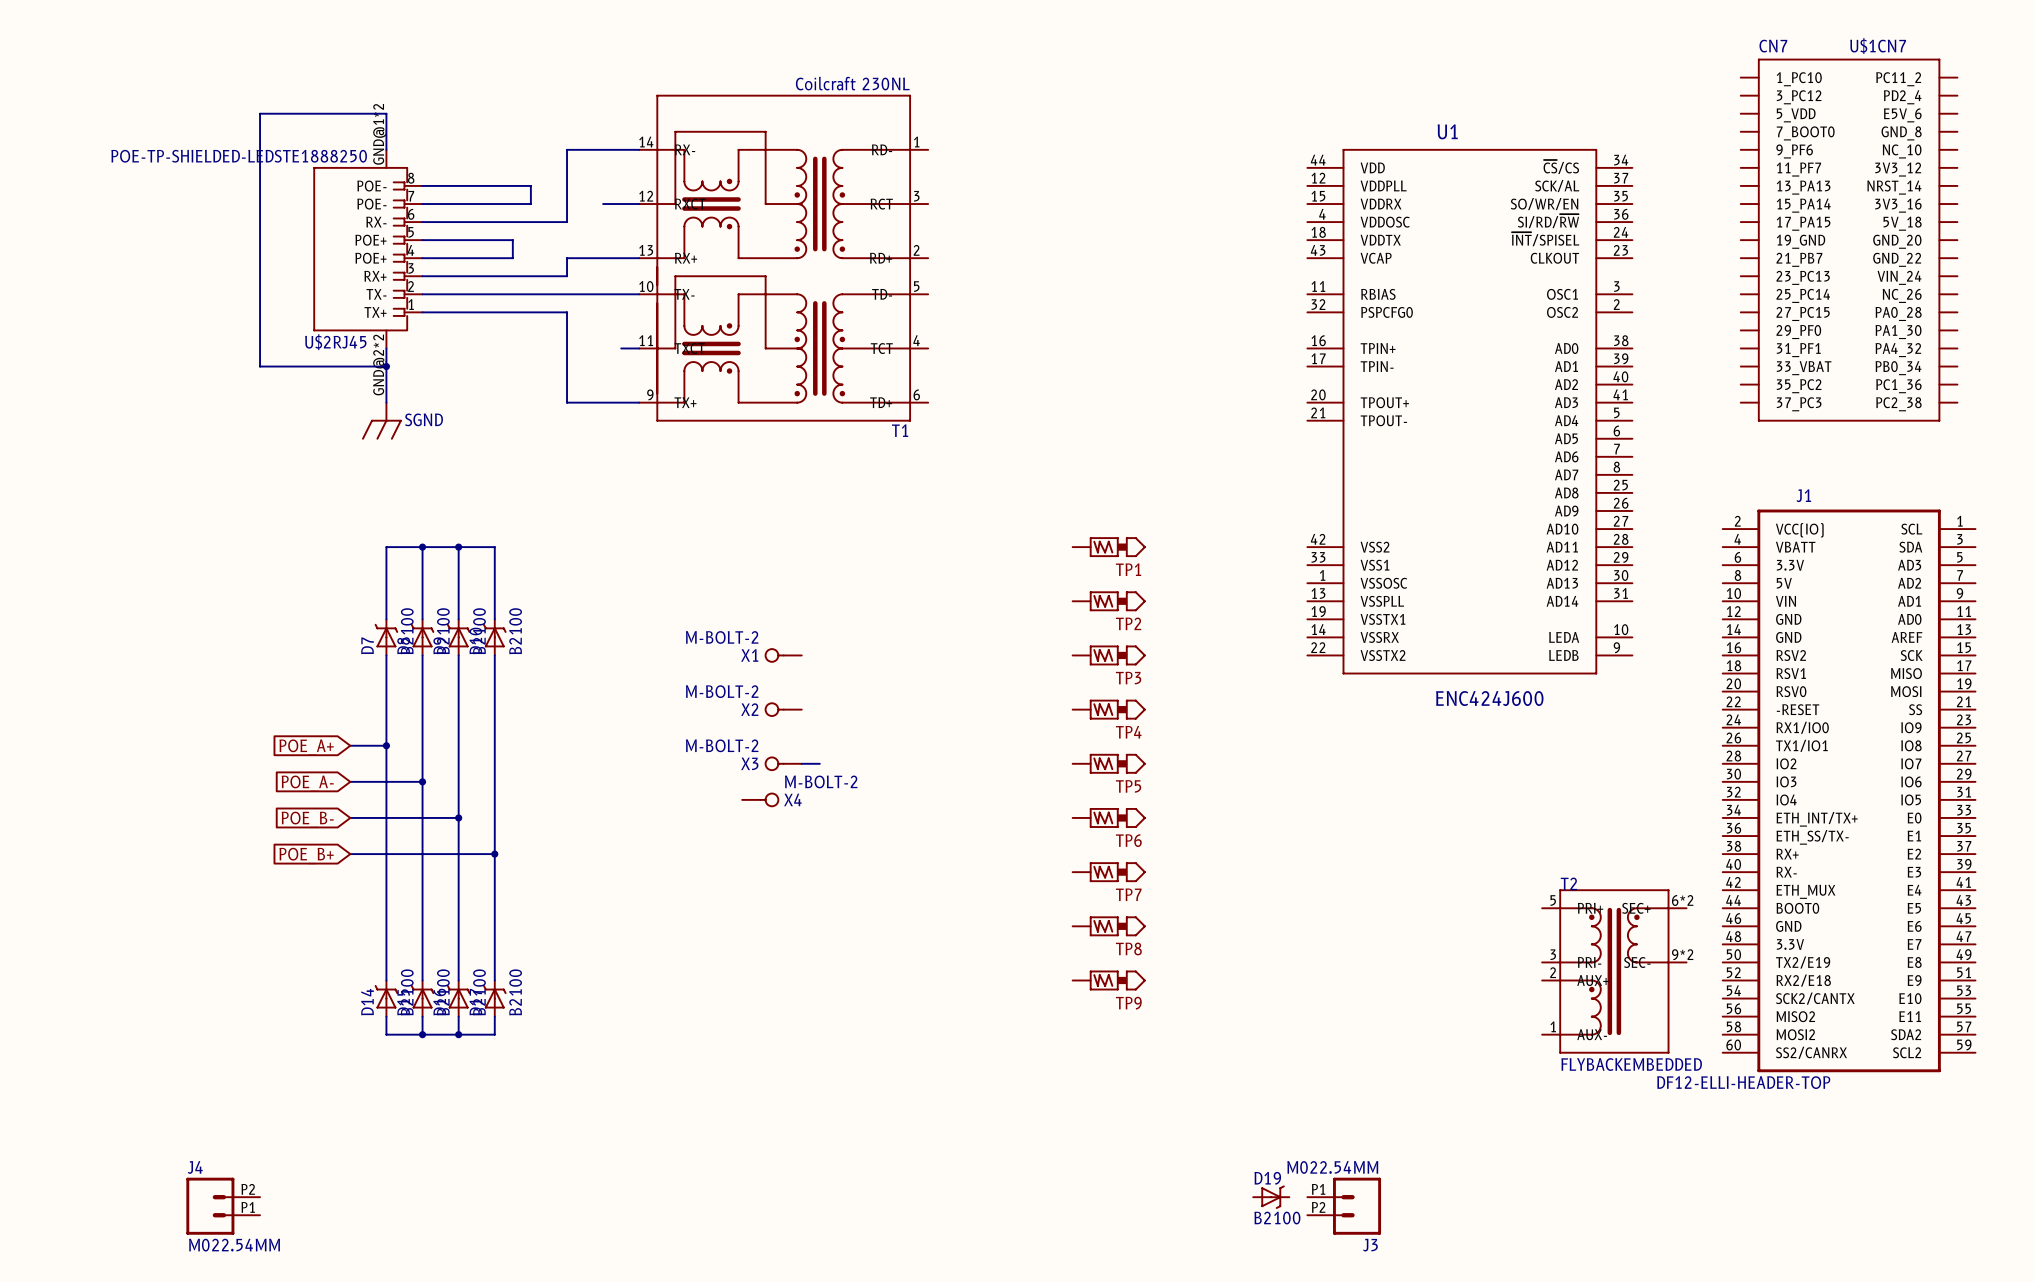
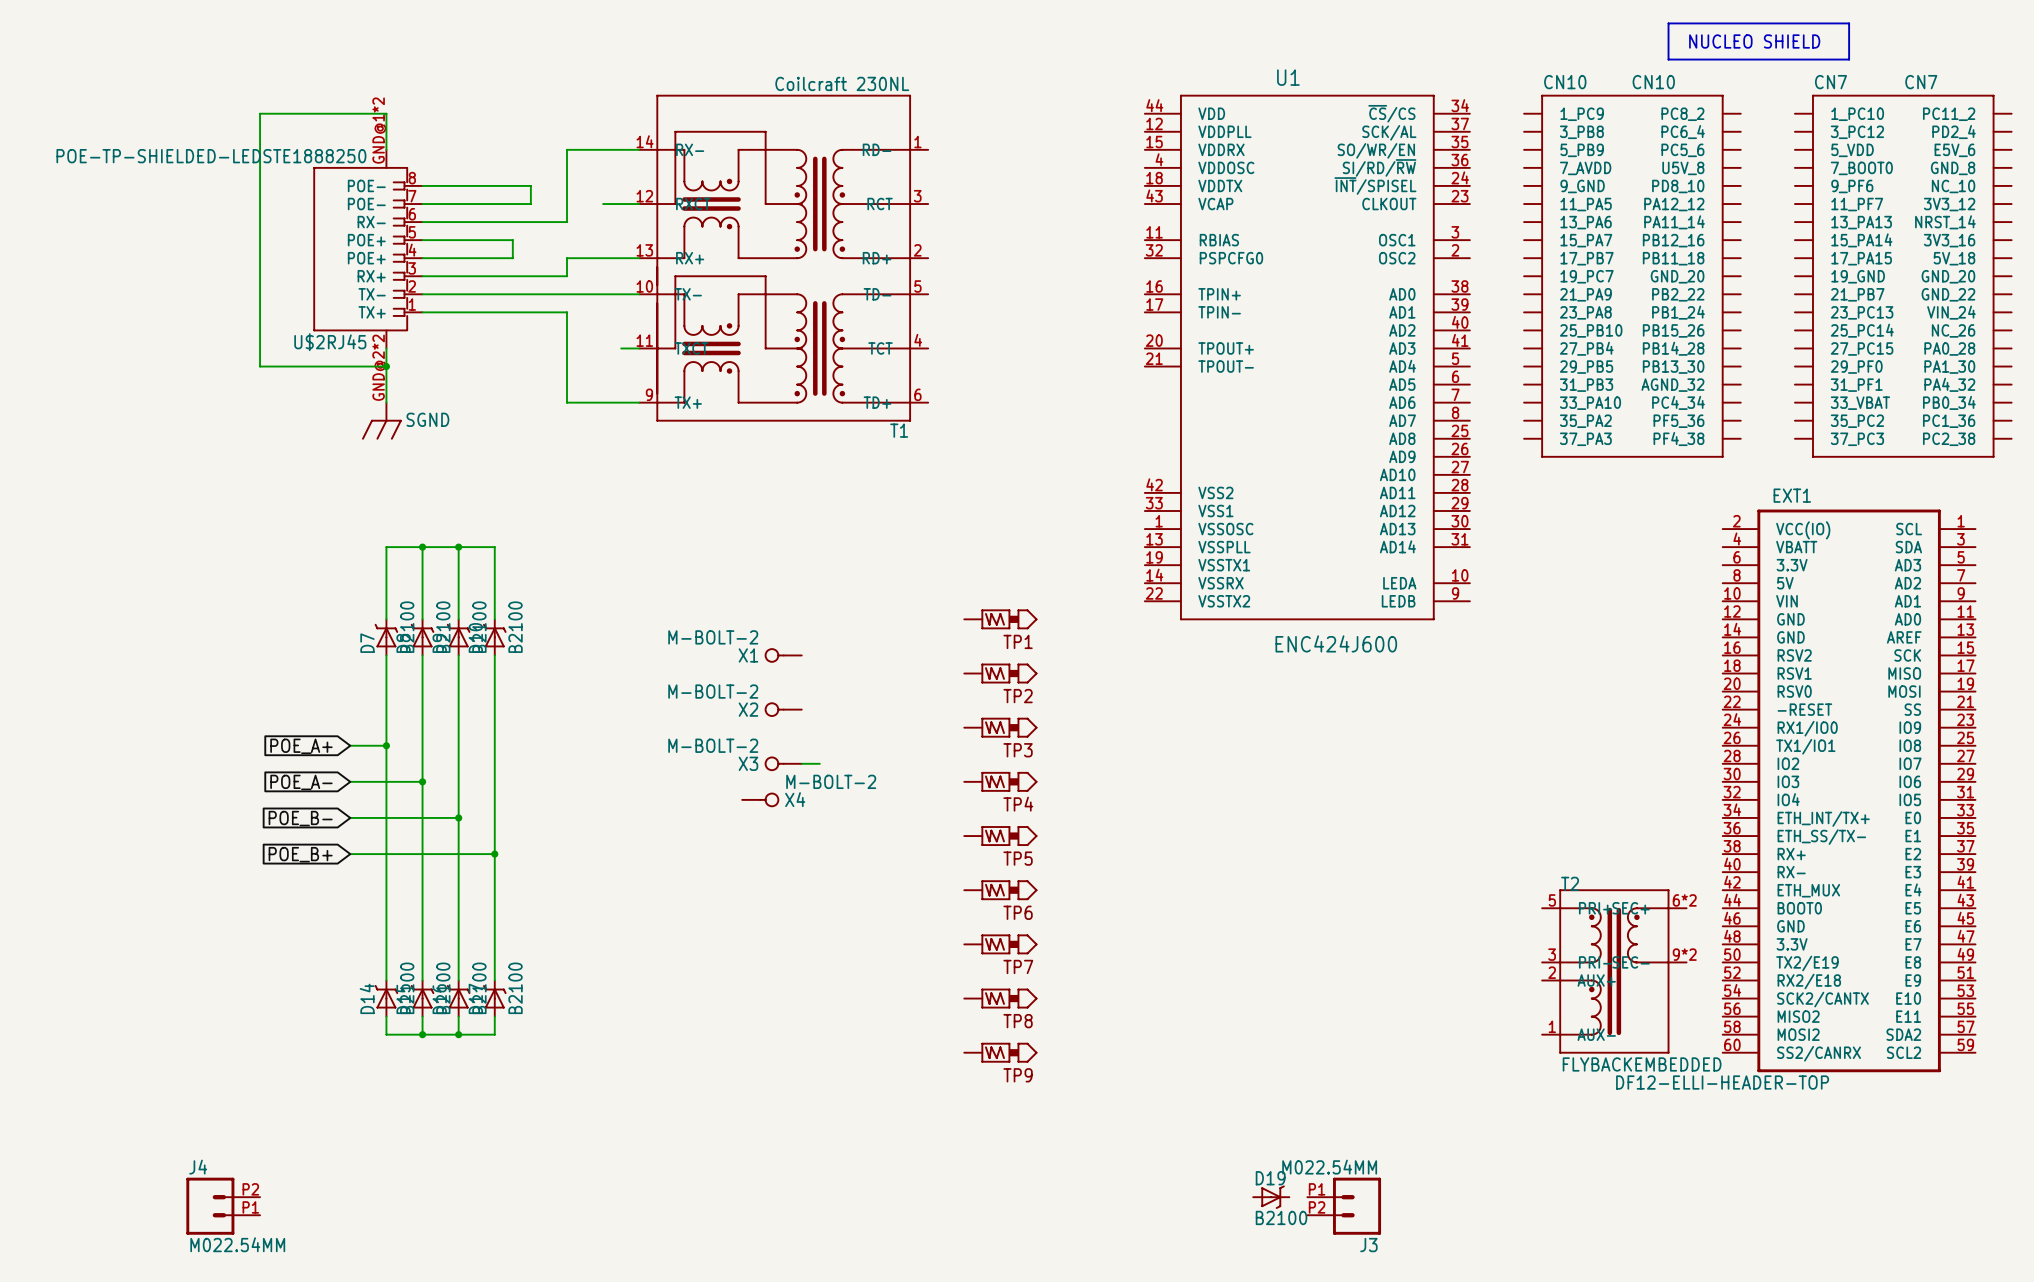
part: none -> (1758, 41)
U$1CN7: (1849, 240) -> none
CN10: none -> (1632, 276)
CN7: none -> (1903, 276)
U1 position: (1469, 411) -> (1307, 357)
J1 name: J1 (1803, 495) -> EXT1 (1792, 495)
TP1 position: (1109, 547) -> (1000, 619)
TP2 position: (1109, 601) -> (1000, 673)
TP3 position: (1109, 655) -> (1000, 727)
TP4 position: (1109, 709) -> (1000, 781)
TP5 position: (1109, 763) -> (1000, 836)
TP6 position: (1109, 817) -> (1000, 890)
TP7 position: (1109, 872) -> (1000, 944)
TP8 position: (1109, 926) -> (1000, 998)
TP9 position: (1109, 980) -> (1000, 1052)

